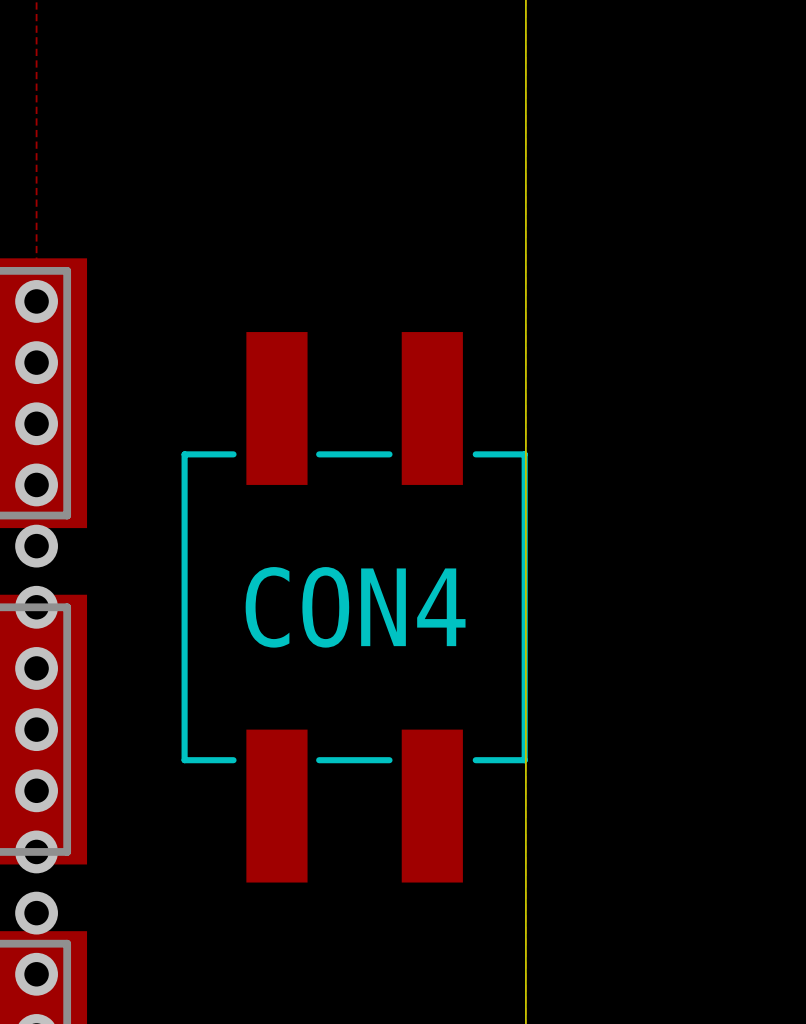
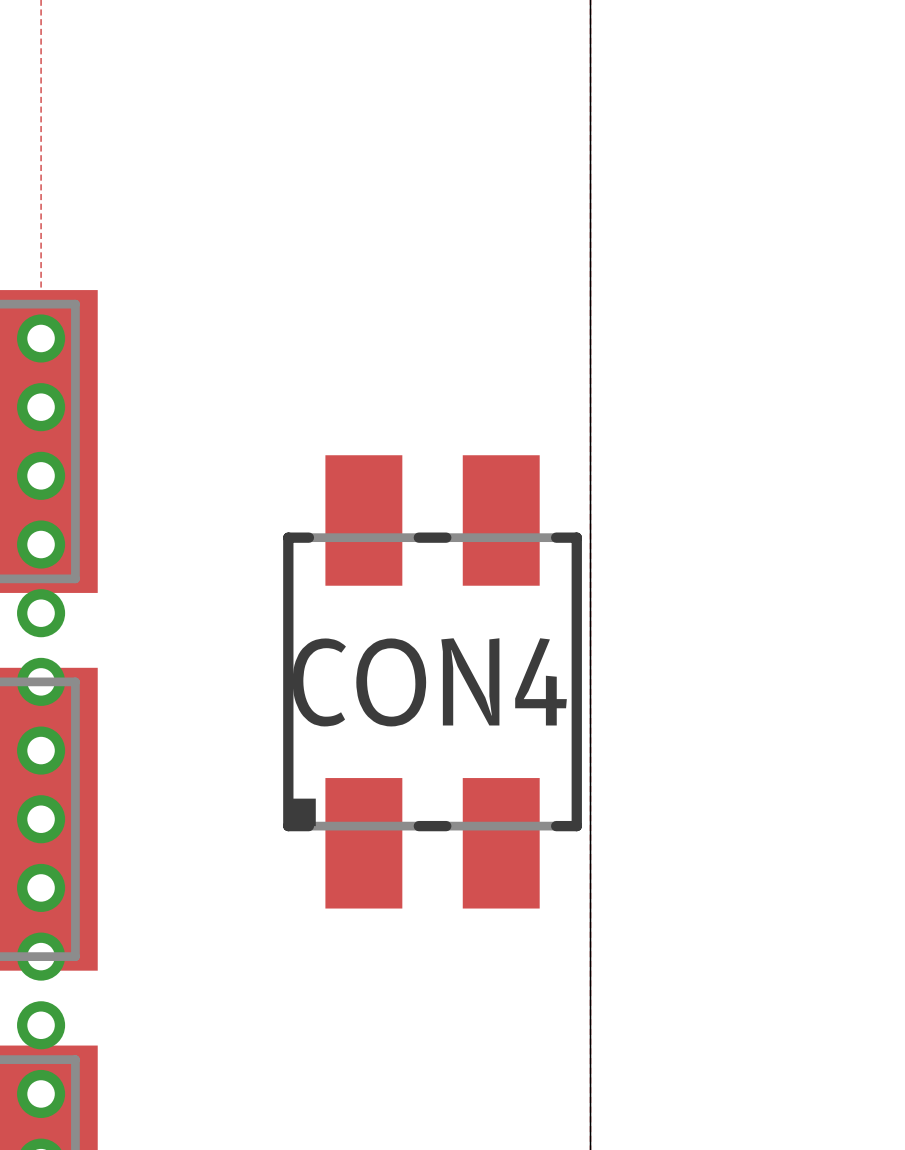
CON4 footprint: [181, 332, 528, 883] -> [283, 455, 582, 909]

